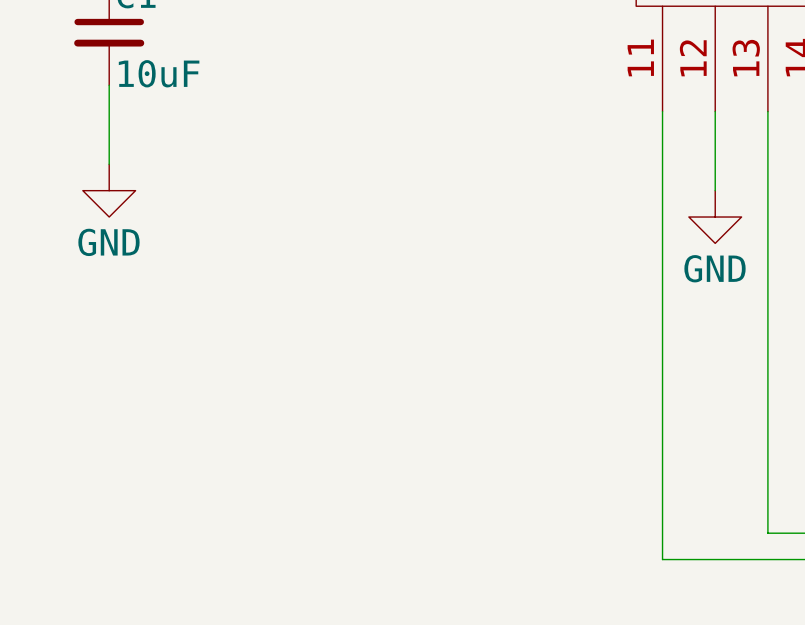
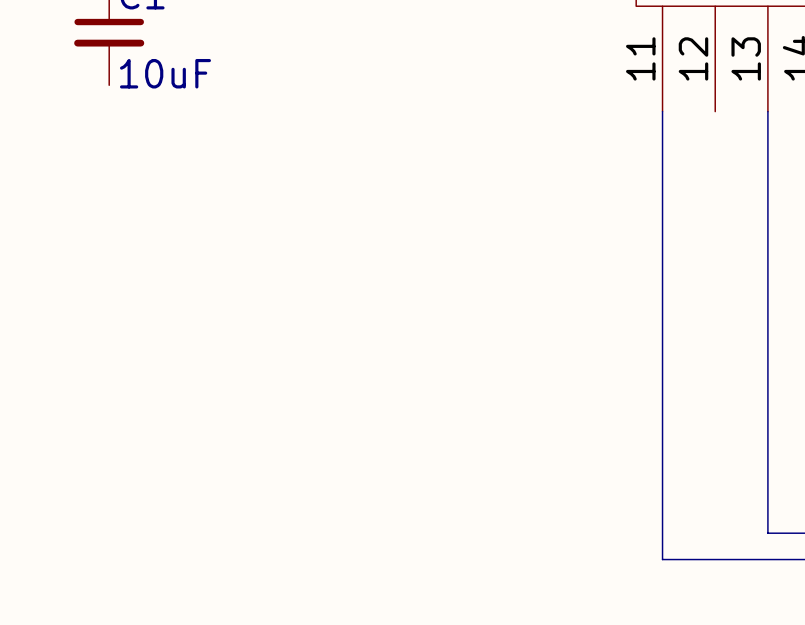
wire: (109, 85) (109, 164) -> none
wire: (715, 111) (715, 190) -> none
power symbol: GND (109, 190) -> none
power symbol: GND (715, 217) -> none

